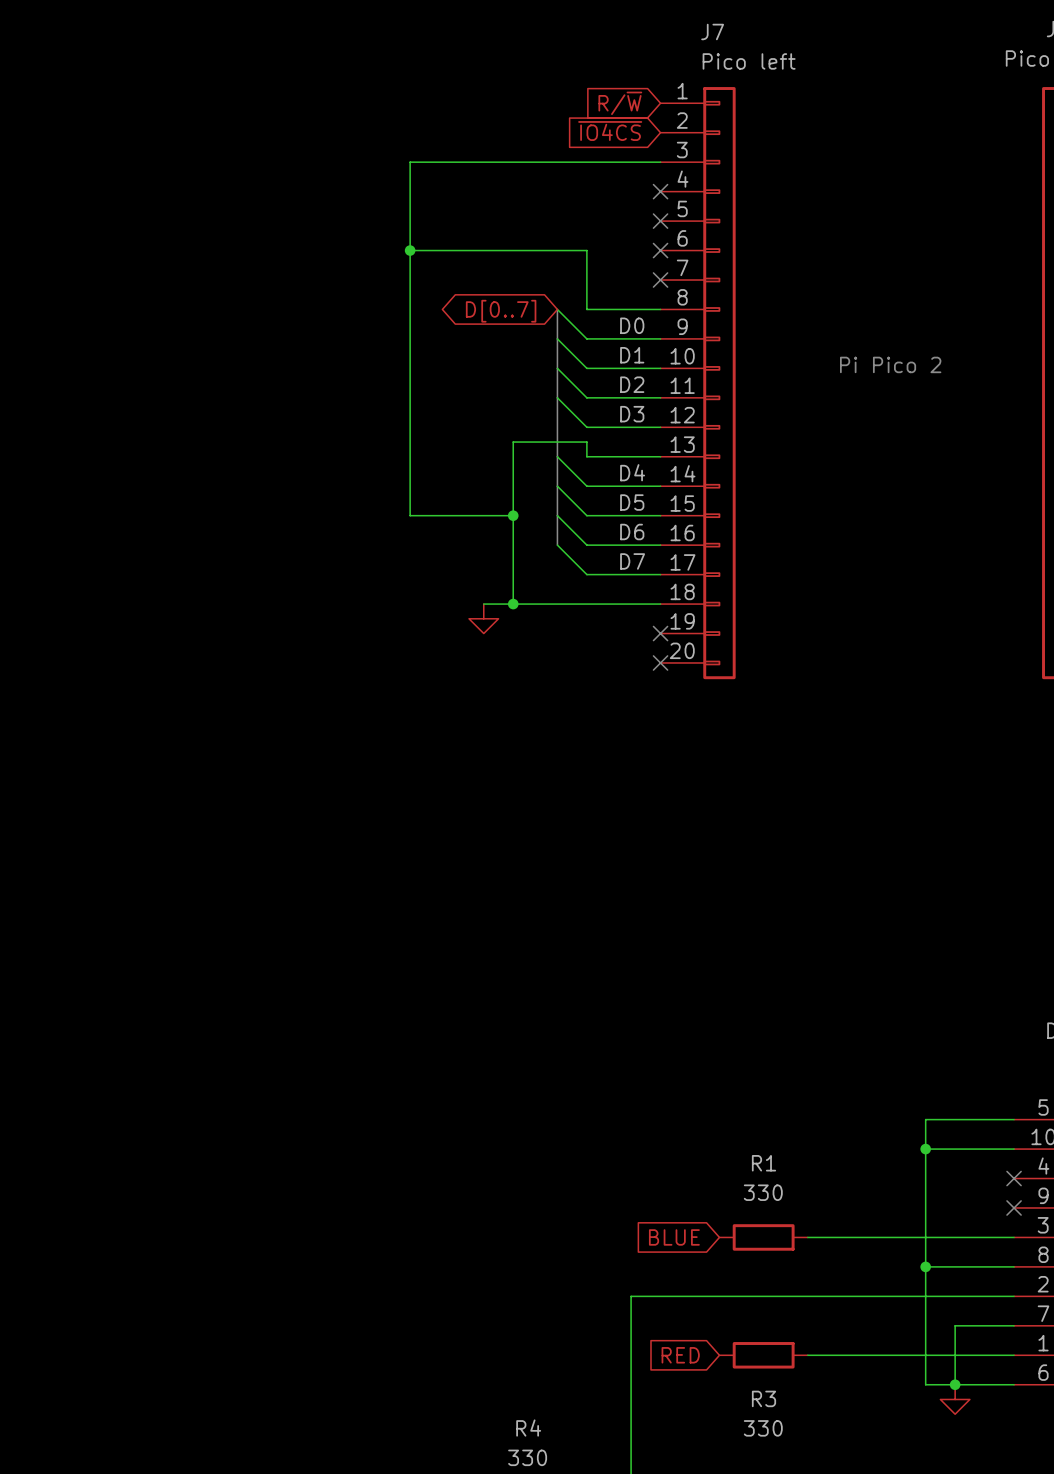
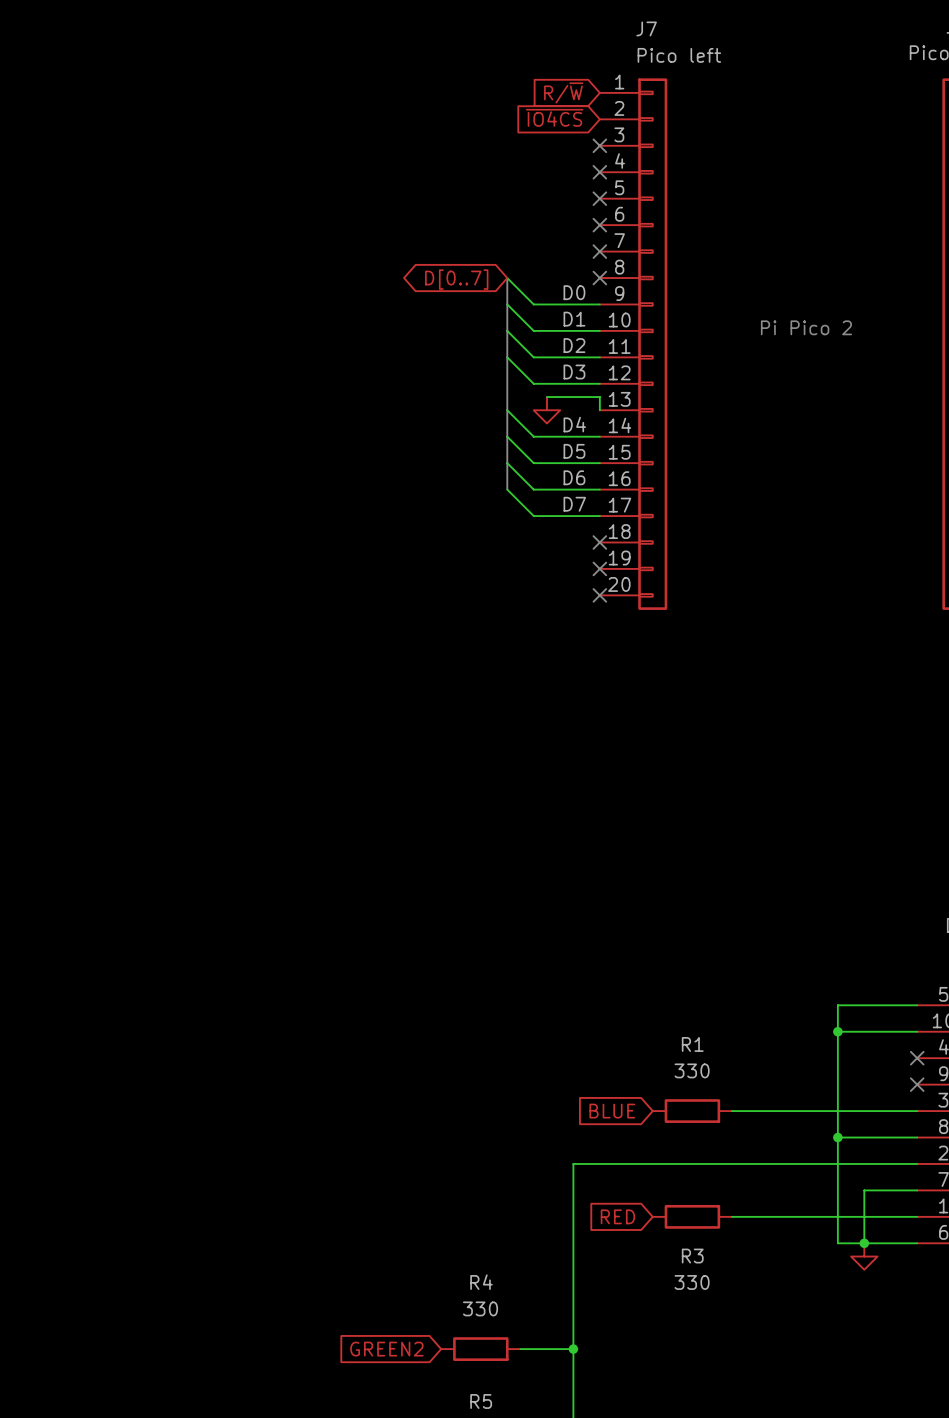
wire: (660, 162) (410, 162) (410, 515) (513, 515) -> none
no-connect mark: none -> (599, 145)
wire: (410, 250) (586, 250) (586, 309) (660, 309) -> none
junction: (410, 250) -> none
no-connect mark: none -> (599, 278)
wire: (660, 456) (586, 456) (586, 442) (513, 442) (513, 604) -> (599, 410) (599, 397) (546, 397)
junction: (513, 515) -> none
wire: (483, 604) (660, 604) -> none
junction: (513, 604) -> none
no-connect mark: none -> (599, 542)
power symbol position: (483, 618) -> (546, 410)

